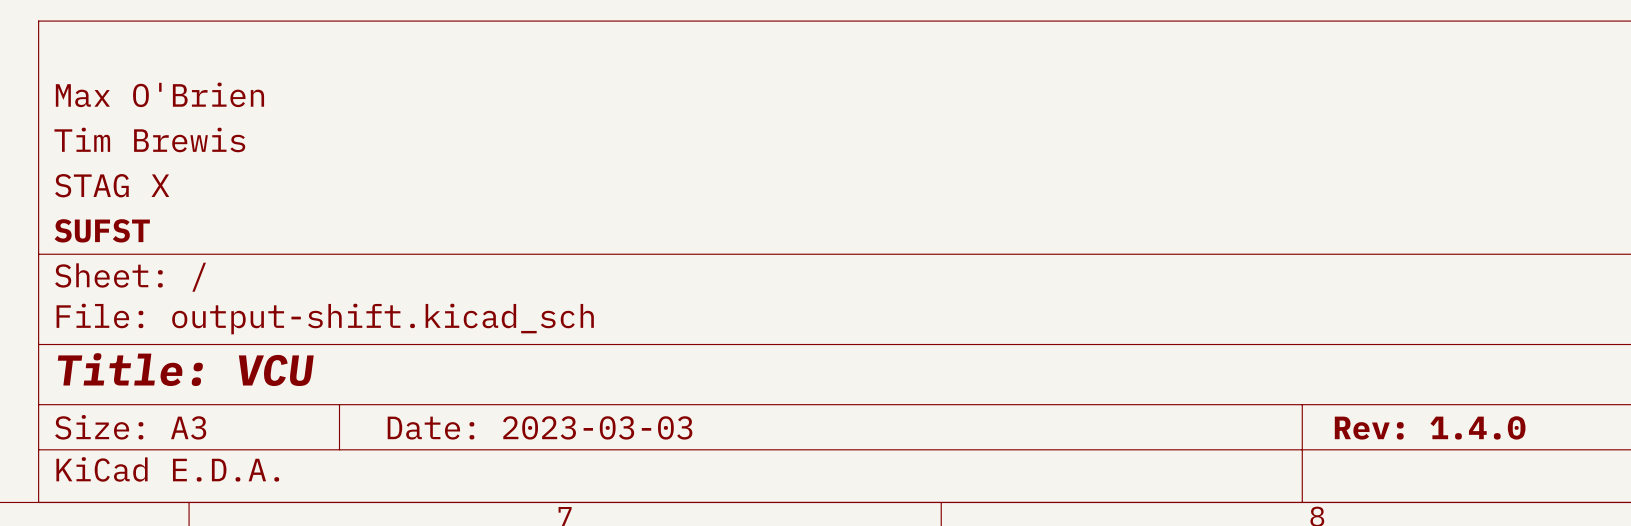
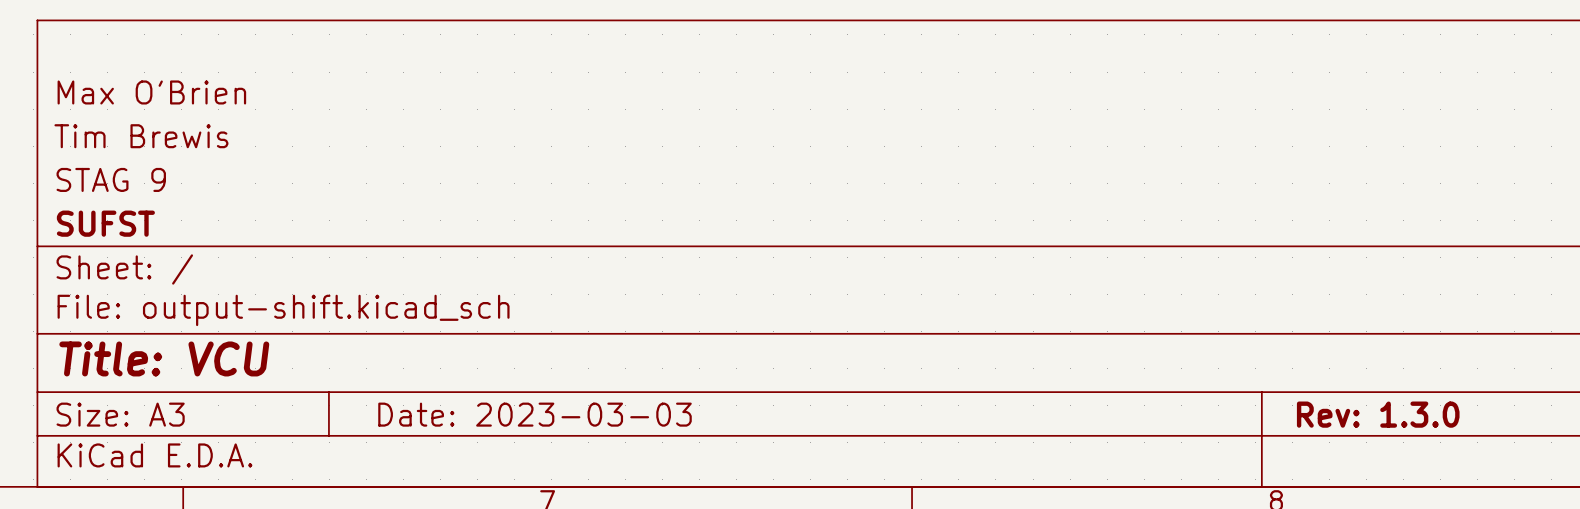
title block: STAG X (112, 185) -> STAG 9 (111, 179)
title block: Rev: 1.4.0 (1430, 427) -> Rev: 1.3.0 (1378, 414)

